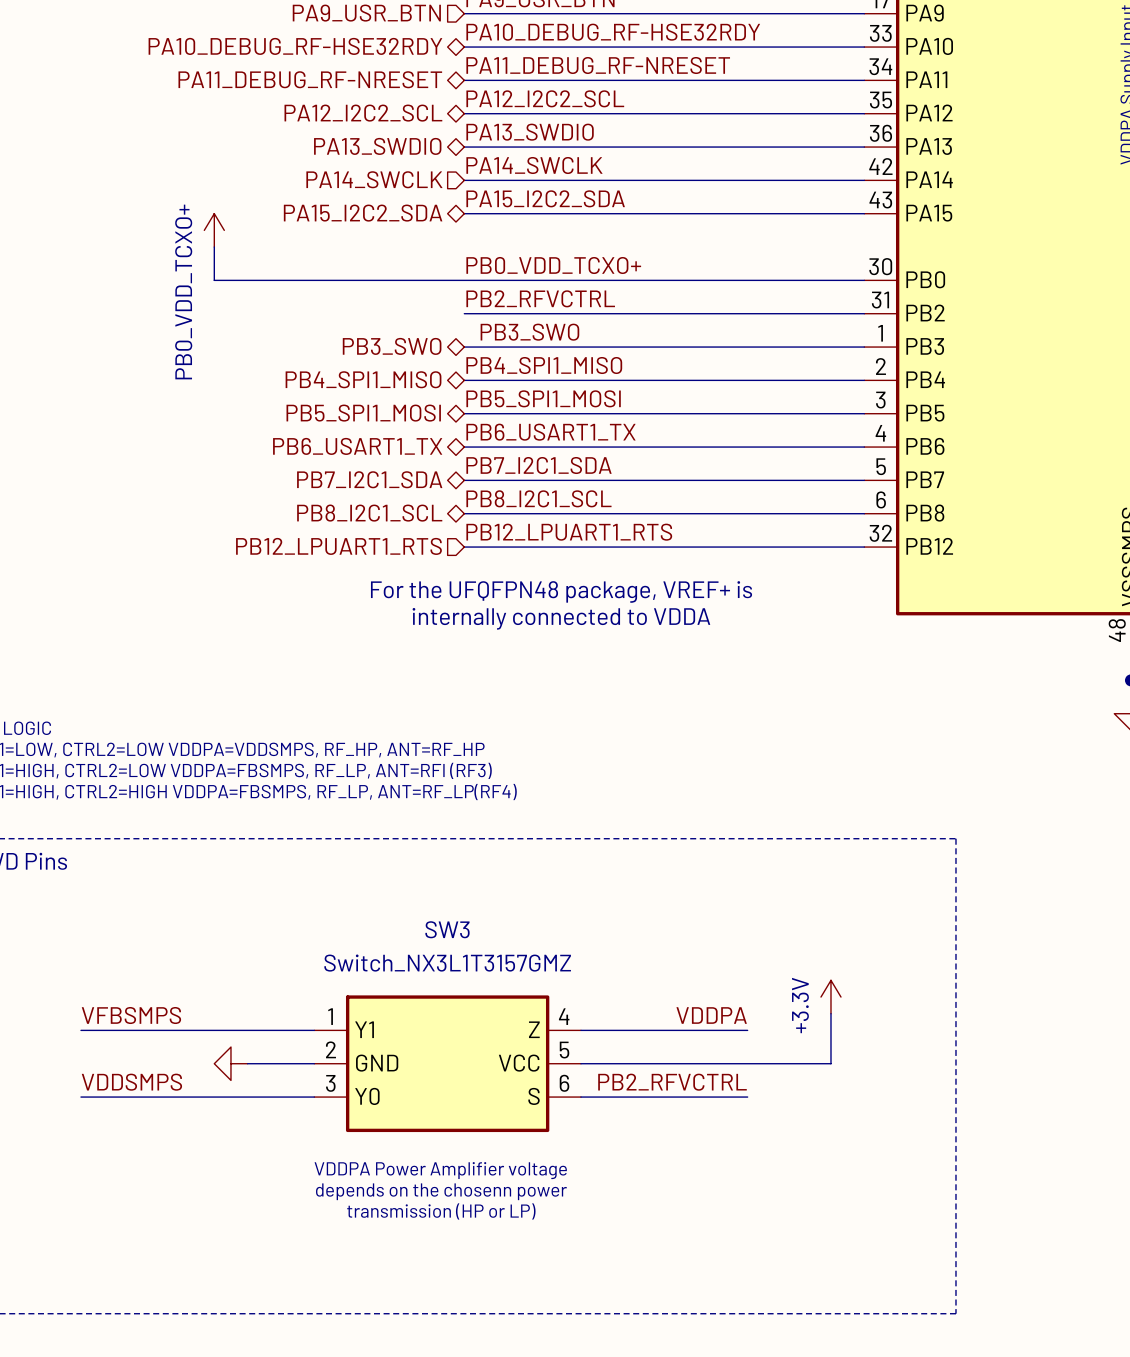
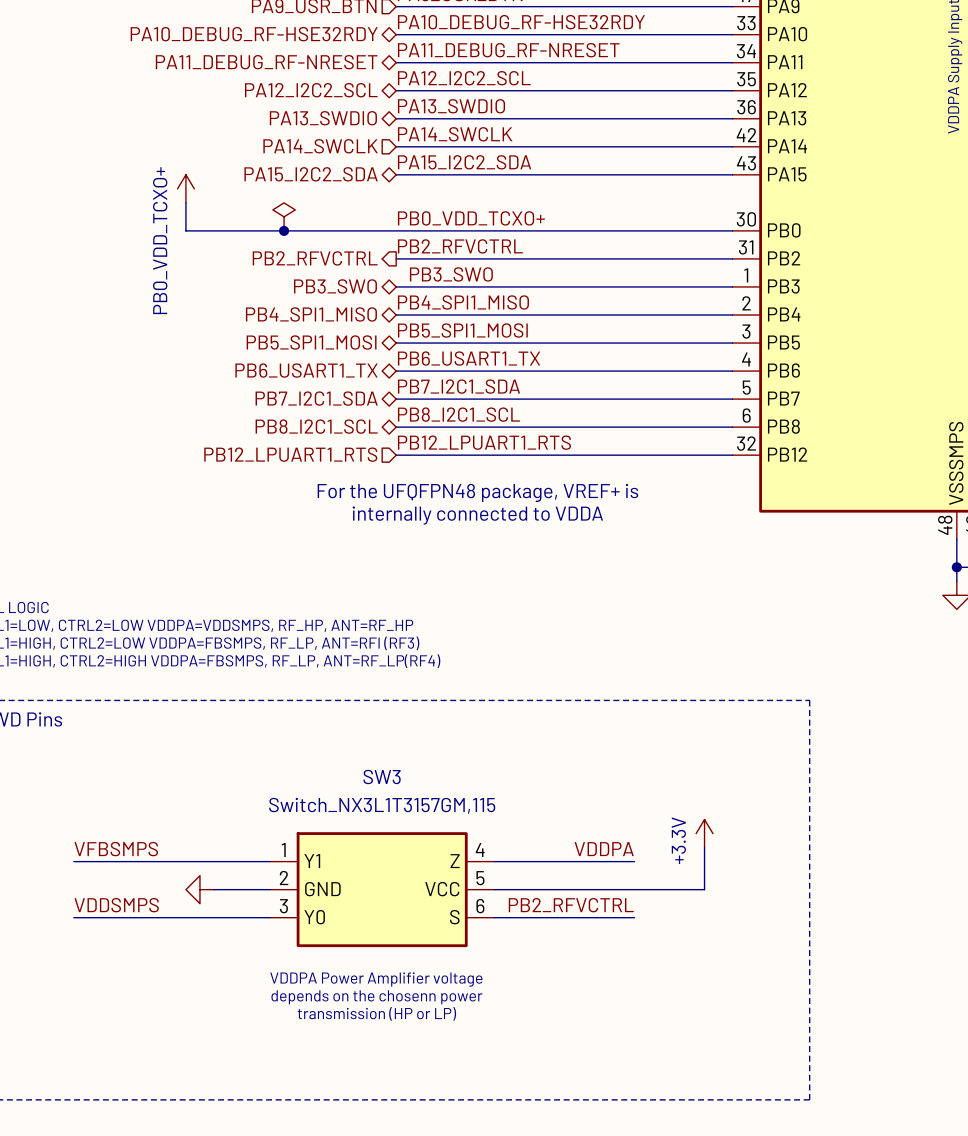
power symbol: none -> (284, 216)
junction: none -> (284, 230)
hierarchical label: none -> PB2_RFVCTRL (315, 258)
SW3 value: Switch_NX3L1T3157GMZ (447, 963) -> Switch_NX3L1T3157GM,115 (382, 805)

